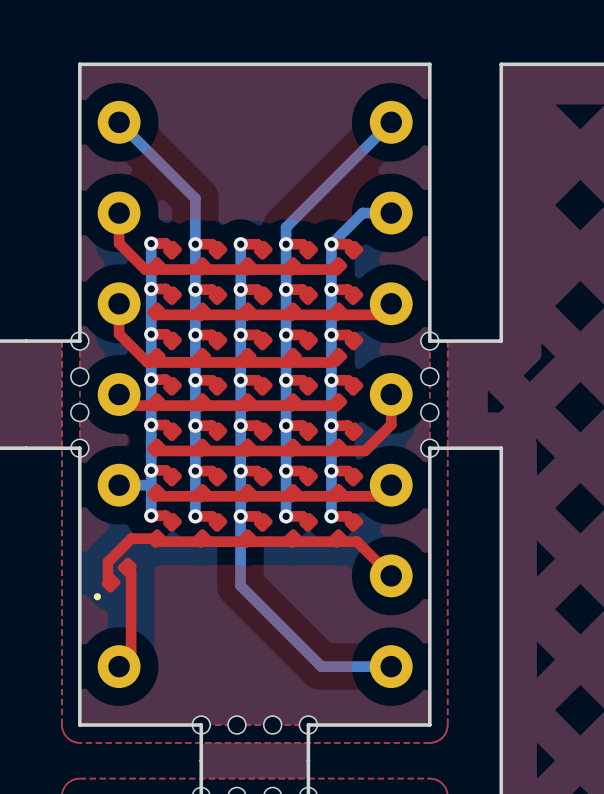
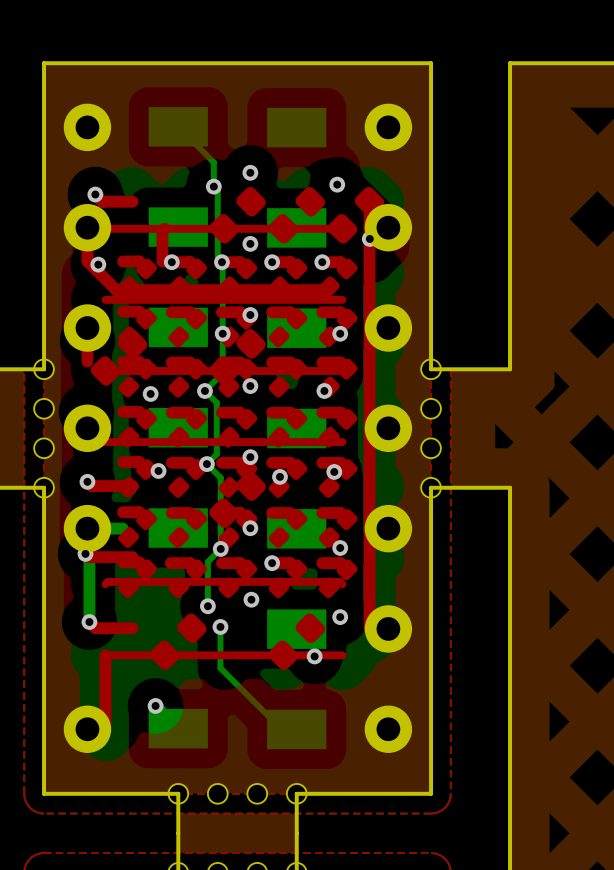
bottom track: none -> (178, 126) (213, 162) (213, 186) (217, 190) (217, 260) (222, 265) (222, 373) (204, 391) (216, 402) (216, 454) (206, 464) (220, 477) (220, 548) (207, 561) (207, 606)
bottom track: (119, 122) (195, 198) (195, 516) -> none
bottom track: (391, 122) (286, 227) (286, 516) -> none
via: none -> (250, 172)
via: none -> (337, 184)
via: none -> (213, 186)
top track: none -> (95, 194) (102, 201) (132, 201)
via: none -> (95, 194)
part: none -> (237, 215)
part: none -> (296, 215)
part: none -> (356, 215)
bottom track: (391, 213) (362, 213) (331, 244) (331, 516) -> none
top track: none -> (105, 228) (342, 228)
top track: none -> (164, 228) (162, 231) (162, 261)
via: none -> (369, 238)
via: none -> (250, 243)
bottom track: (151, 243) (151, 515) -> none
via position: (151, 243) -> (98, 264)
bottom track: (240, 244) (240, 516) -> none
top track: none -> (105, 299) (342, 299)
via: (151, 288) -> none
via: (195, 289) -> none
via: (240, 289) -> none
via: (286, 289) -> none
via: (331, 289) -> none
via: none -> (250, 314)
top track: (391, 303) (380, 314) (159, 314) (156, 311) -> none
via: none -> (222, 333)
via: none -> (340, 333)
part: none -> (119, 357)
part: none -> (237, 357)
via: (151, 334) -> none
via: (195, 334) -> none
via: (240, 334) -> none
via: (286, 334) -> none
via: (331, 334) -> none
top track: none -> (105, 370) (342, 370)
via: none -> (250, 386)
top track: (337, 357) (332, 362) (147, 362) (119, 334) (145, 360) (334, 360) -> none
via: none -> (204, 391)
via: none -> (324, 391)
via: none -> (150, 393)
via: (151, 379) -> none
via: (195, 380) -> none
via: (240, 380) -> none
via: (286, 380) -> none
via: (331, 380) -> none
top track: (119, 394) (130, 405) (334, 405) (337, 402) -> none
part: none -> (237, 428)
top track: (391, 394) (391, 424) (365, 450) (159, 450) (156, 447) -> none
top track: none -> (105, 442) (342, 442)
via: none -> (250, 457)
via: (151, 425) -> none
via position: (195, 425) -> (158, 470)
via position: (240, 425) -> (206, 464)
via position: (286, 425) -> (279, 476)
via position: (331, 425) -> (334, 471)
top track: none -> (87, 481) (91, 486) (132, 486)
via: none -> (87, 481)
part: none -> (237, 499)
via: (151, 470) -> none
via: (195, 471) -> none
via: (240, 471) -> none
via: (286, 471) -> none
via: (331, 471) -> none
via: none -> (250, 528)
top track: (391, 485) (380, 496) (159, 496) (156, 493) -> none
via: none -> (340, 547)
top track: none -> (85, 553) (88, 557) (132, 557)
bottom track: none -> (85, 553) (89, 557) (89, 622)
via: none -> (85, 553)
via: (151, 515) -> none
via: (195, 516) -> none
bottom track: (240, 516) (240, 585) (321, 666) (391, 666) -> none
via position: (240, 516) -> (220, 548)
via: (331, 516) -> none
top track: none -> (105, 584) (107, 581) (340, 581) (342, 584)
via: none -> (251, 599)
via: none -> (207, 606)
via: none -> (340, 617)
top track: (127, 566) (131, 570) (131, 654) (119, 666) -> none
top track: none -> (89, 622) (95, 628) (132, 628)
via: none -> (89, 622)
bottom track: none -> (220, 626) (220, 668) (281, 729) (296, 729)
via: none -> (220, 626)
top track: (375, 575) (391, 575) (357, 541) (159, 541) (156, 538) (131, 538) (107, 562) (107, 580) (111, 583) -> (369, 628) (369, 201)
part: (115, 578) -> none
part: none -> (178, 641)
part: none -> (296, 641)
top track: none -> (342, 655) (105, 655) (105, 726)
via: none -> (314, 656)
via: none -> (155, 705)

